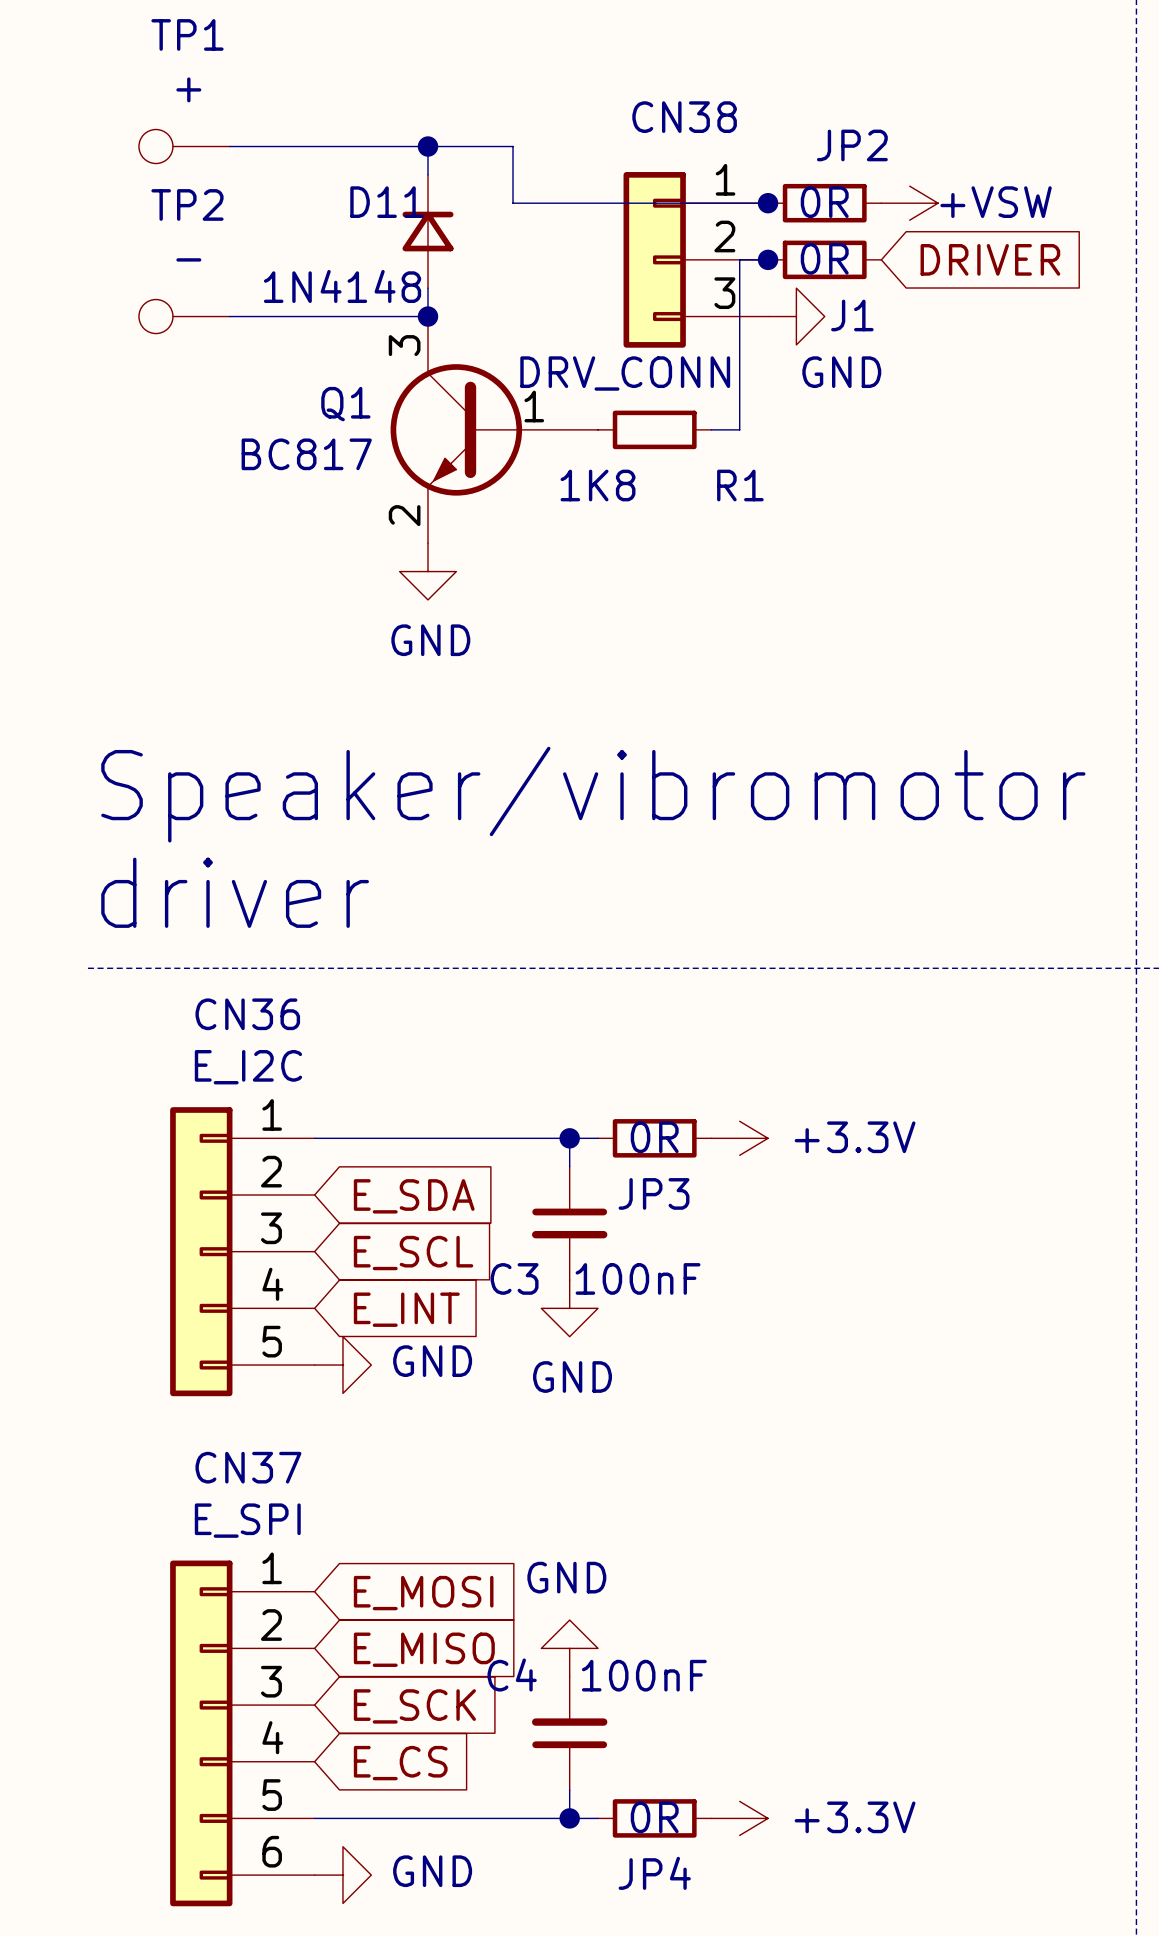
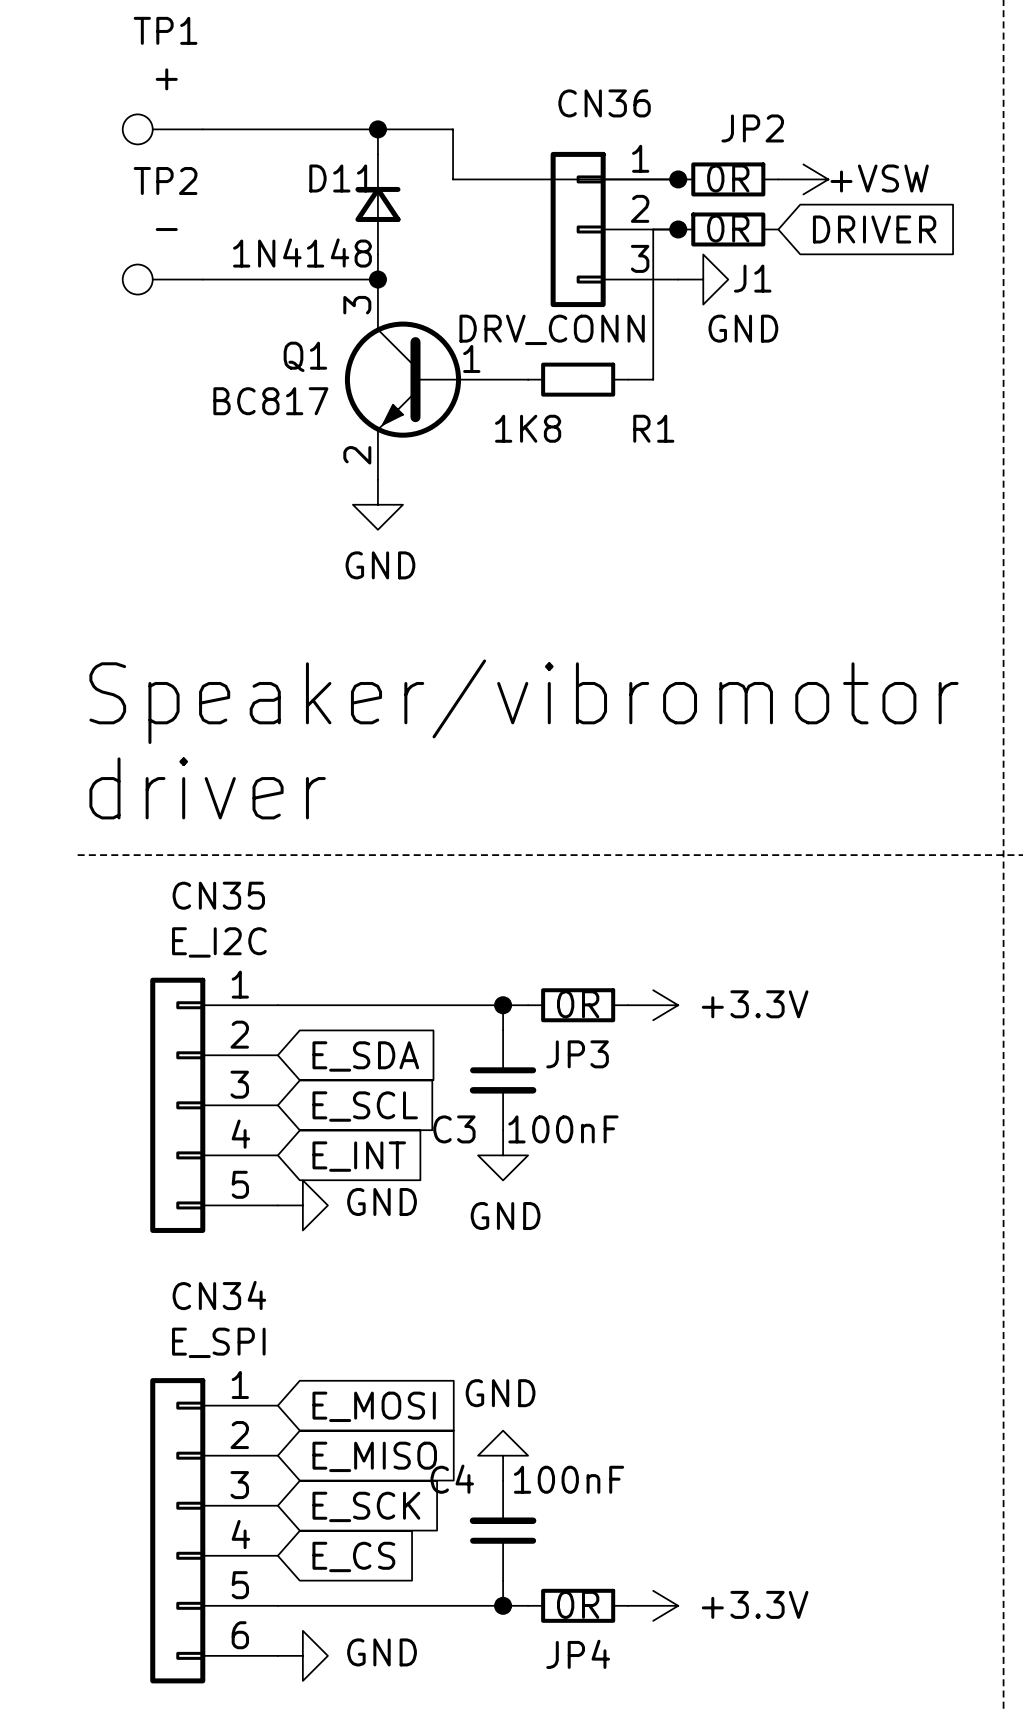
CN38 name: CN38 (684, 117) -> CN36 (604, 103)
CN36 name: CN36 (247, 1014) -> CN35 (218, 895)
CN37 name: CN37 (248, 1467) -> CN34 (219, 1295)

